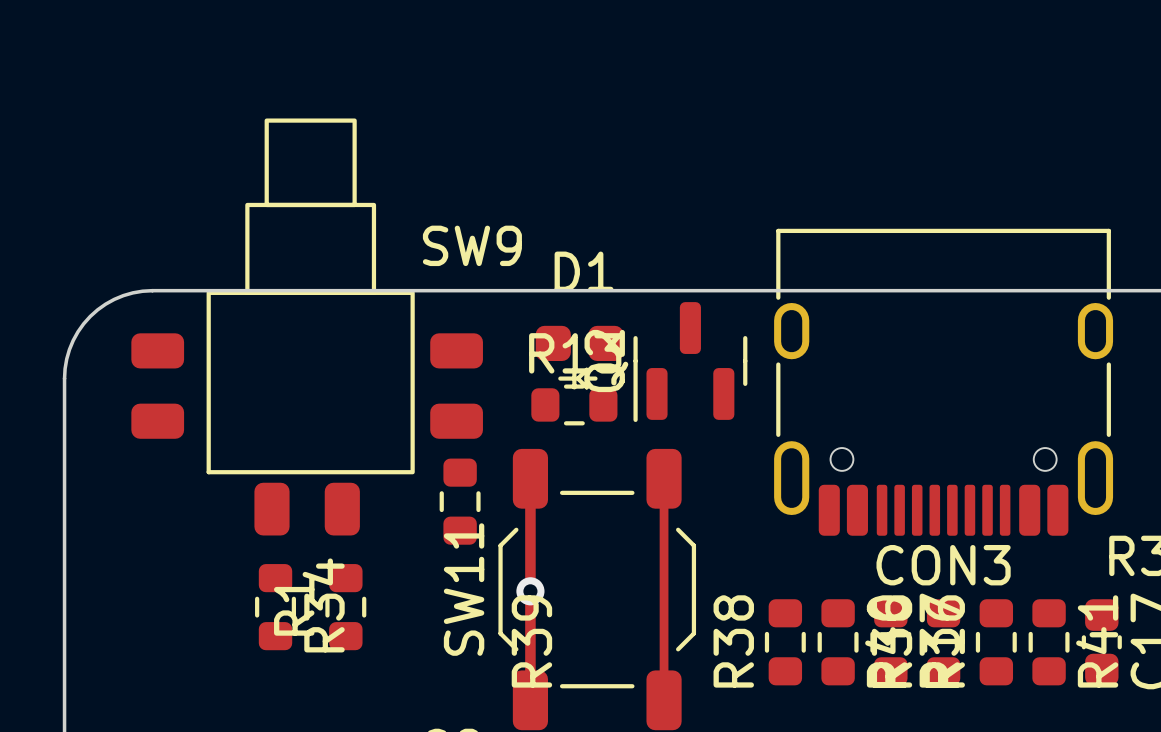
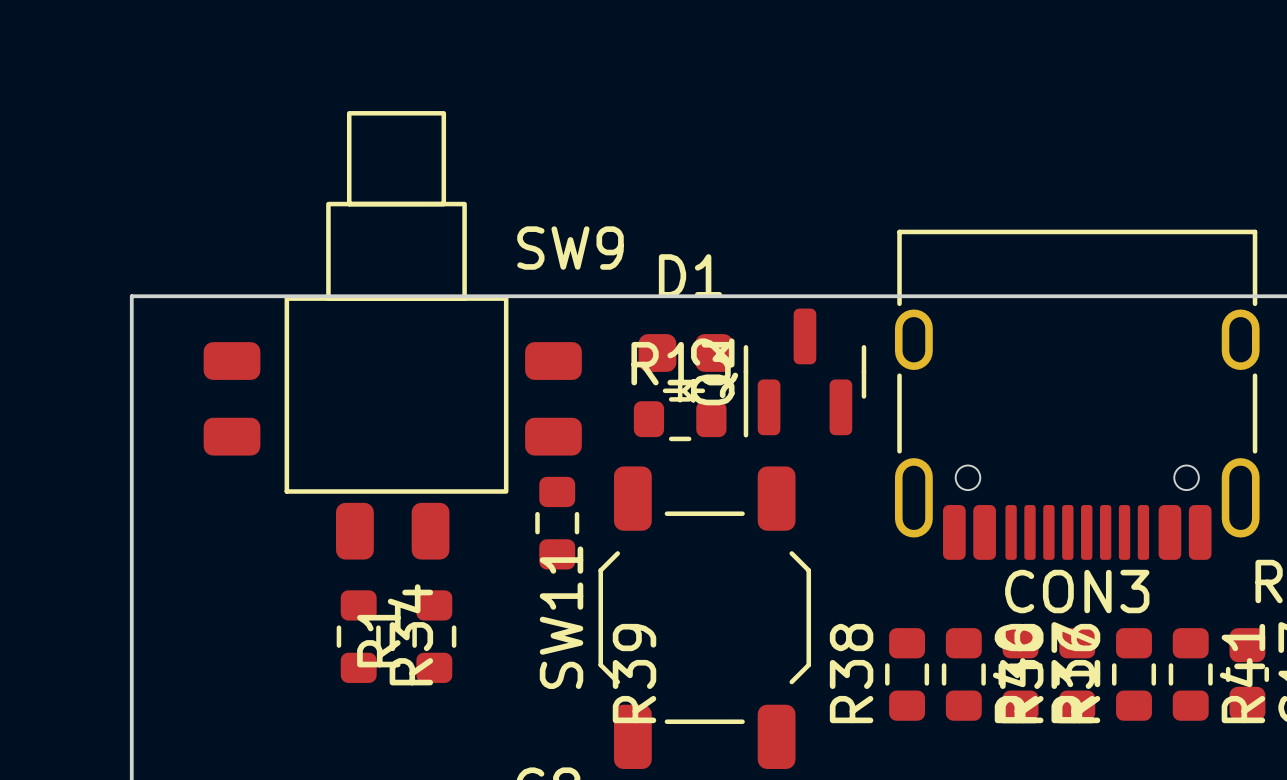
board edge: (152, 290) (132, 292) (114, 299) (90, 316) (73, 340) (66, 359) (64, 378) -> (226, 296) (131, 296) (131, 390)
track: (530, 478) (530, 700) -> none
track: (664, 478) (664, 700) -> none
via: (530, 591) -> none

